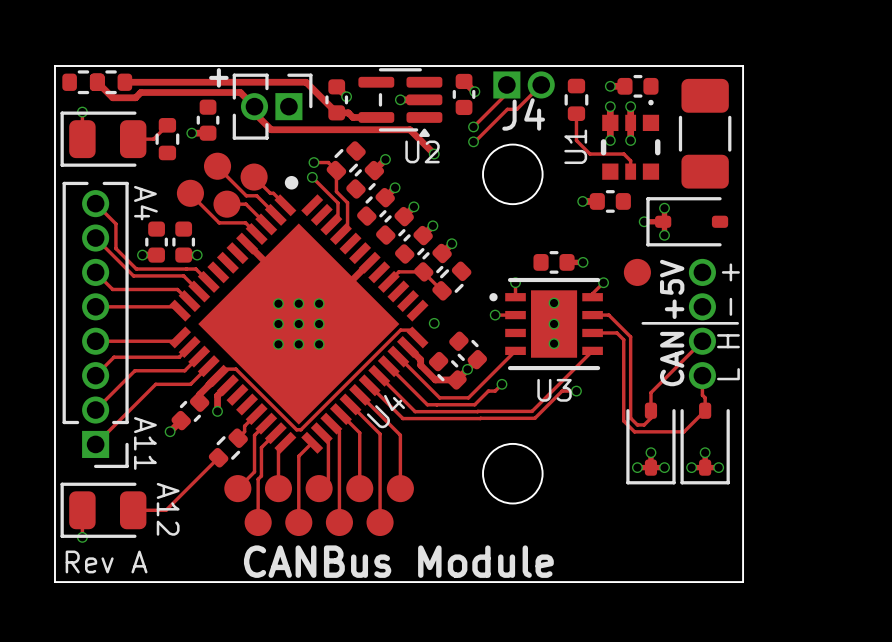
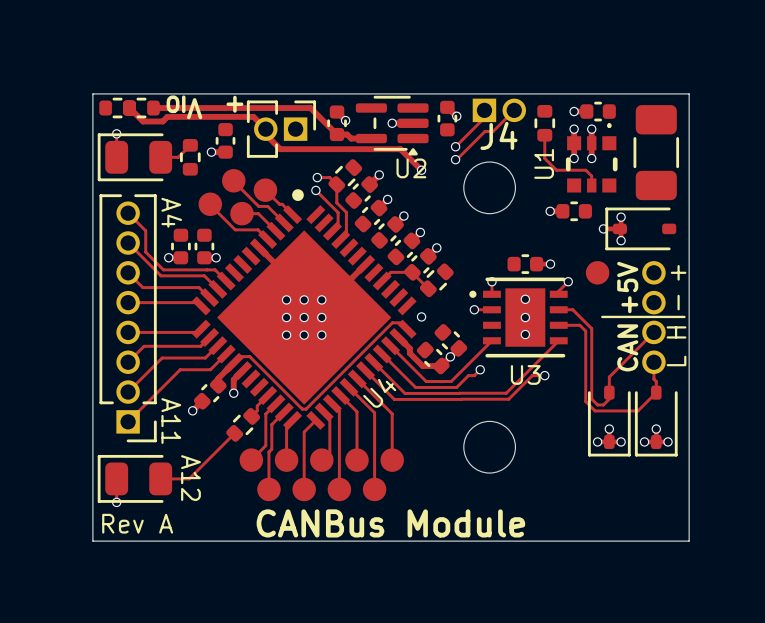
text: none -> VIO (184, 107)

